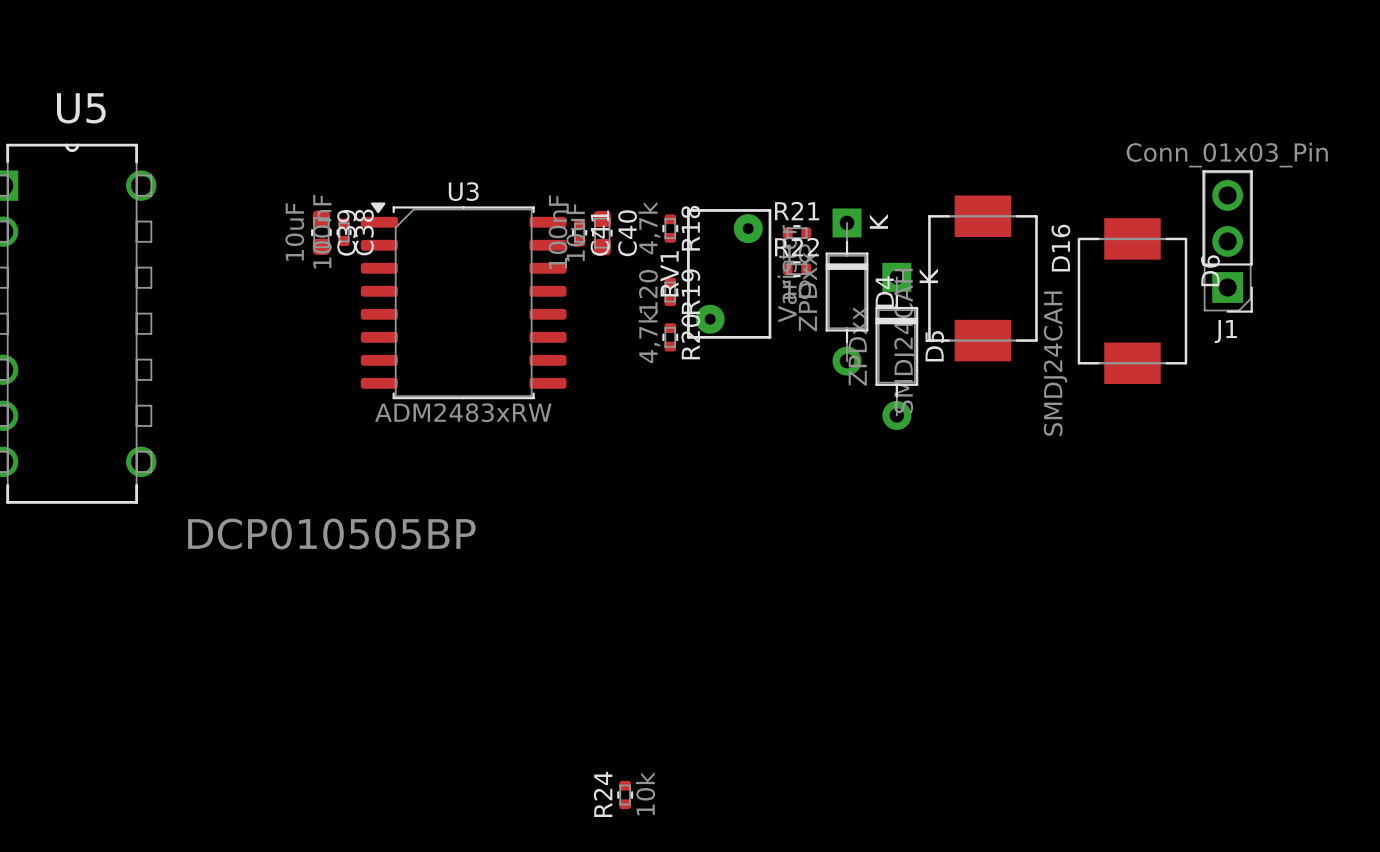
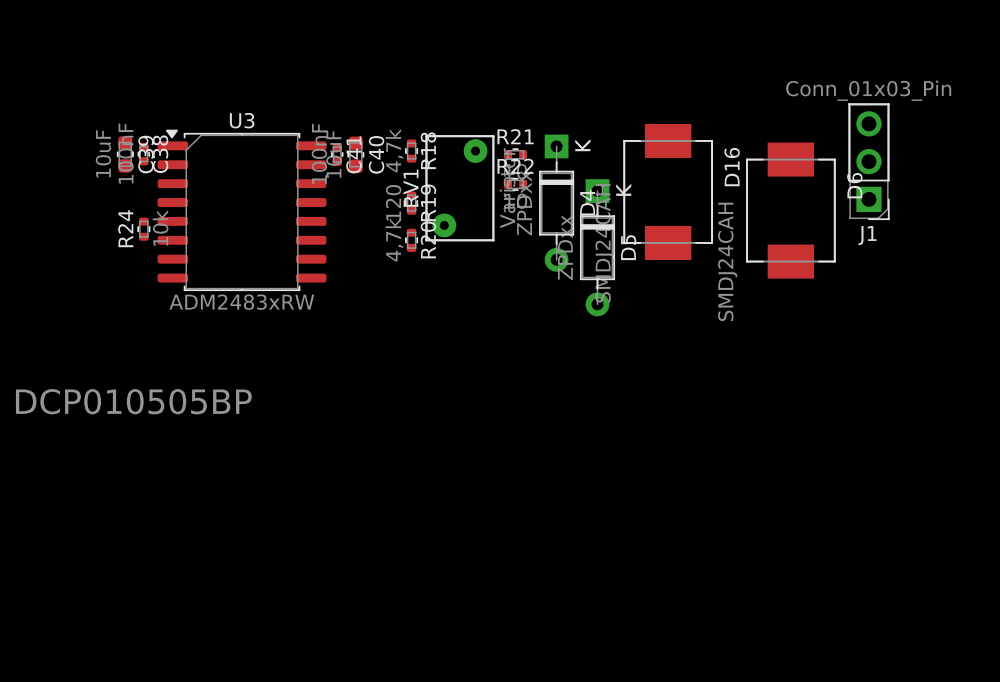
R24 position: (625, 794) -> (143, 229)

